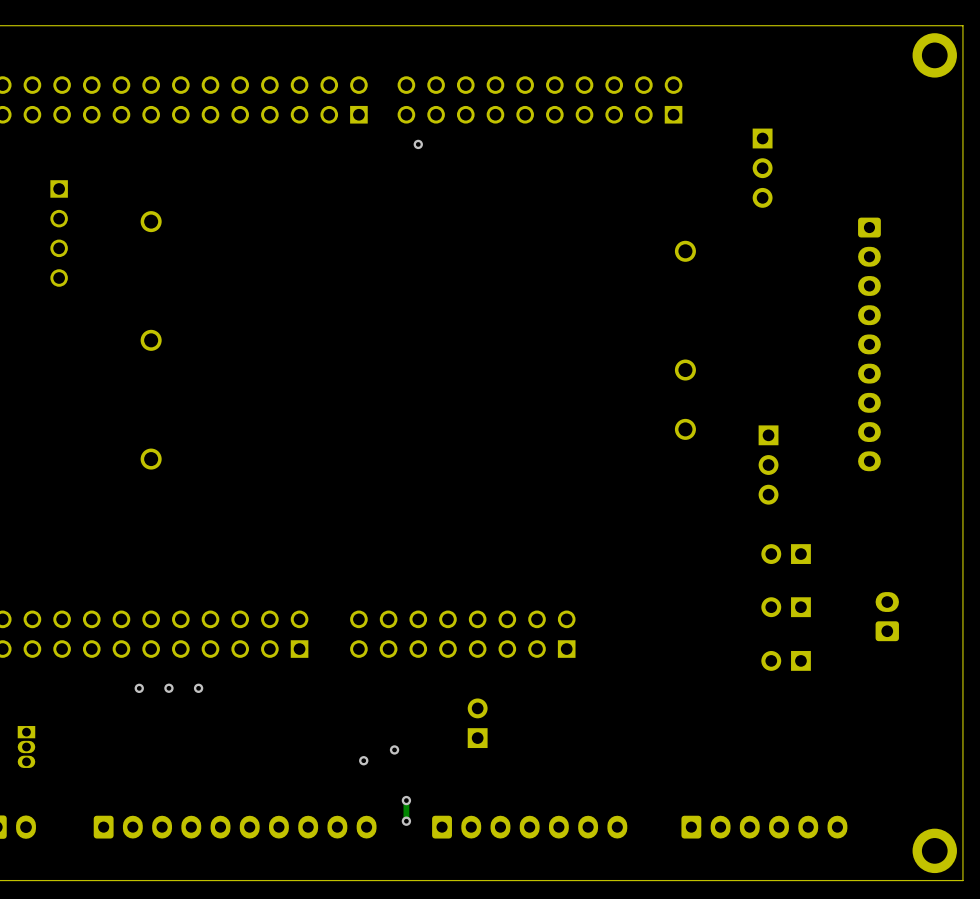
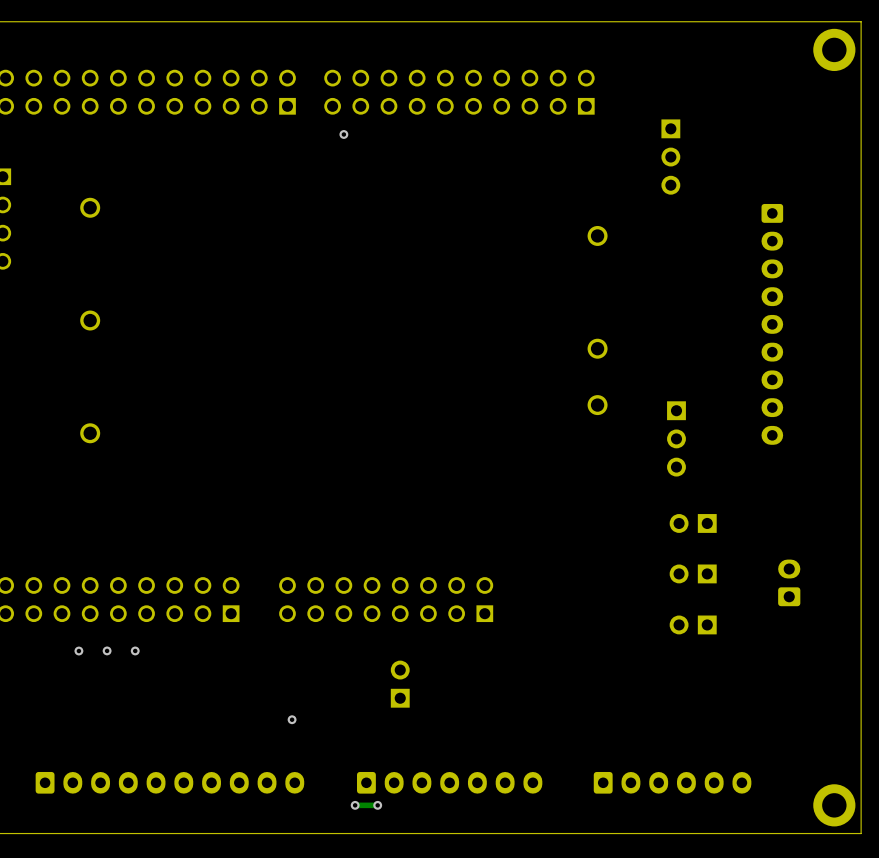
via: (394, 749) -> none
track: (406, 800) (406, 821) -> none
via: (406, 800) -> none
via: (406, 821) -> none
via: none -> (355, 805)
track: none -> (377, 805) (355, 805)
via: none -> (377, 805)

